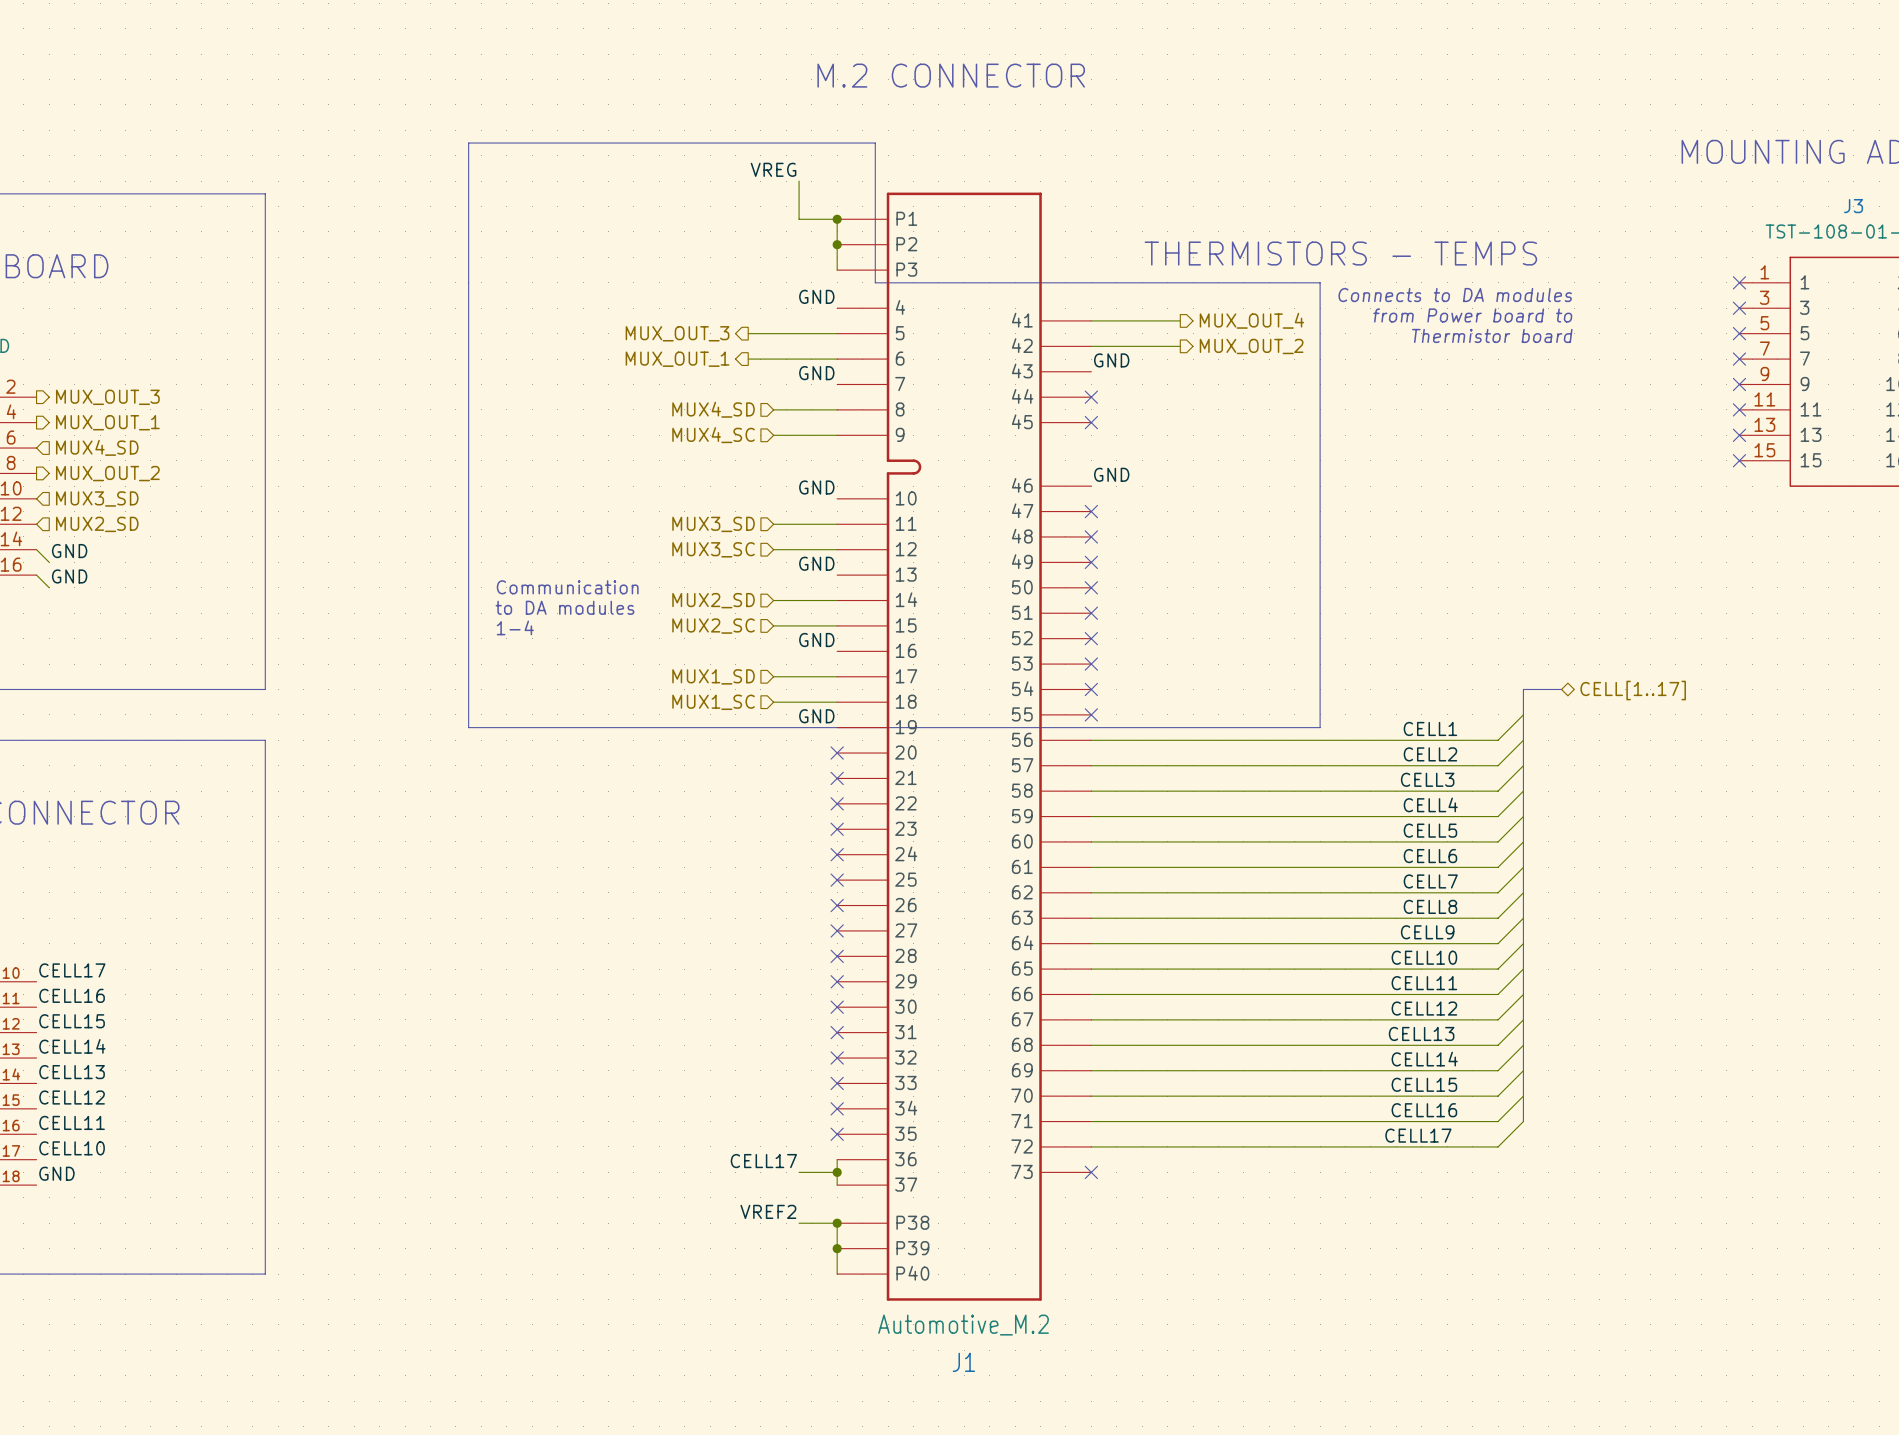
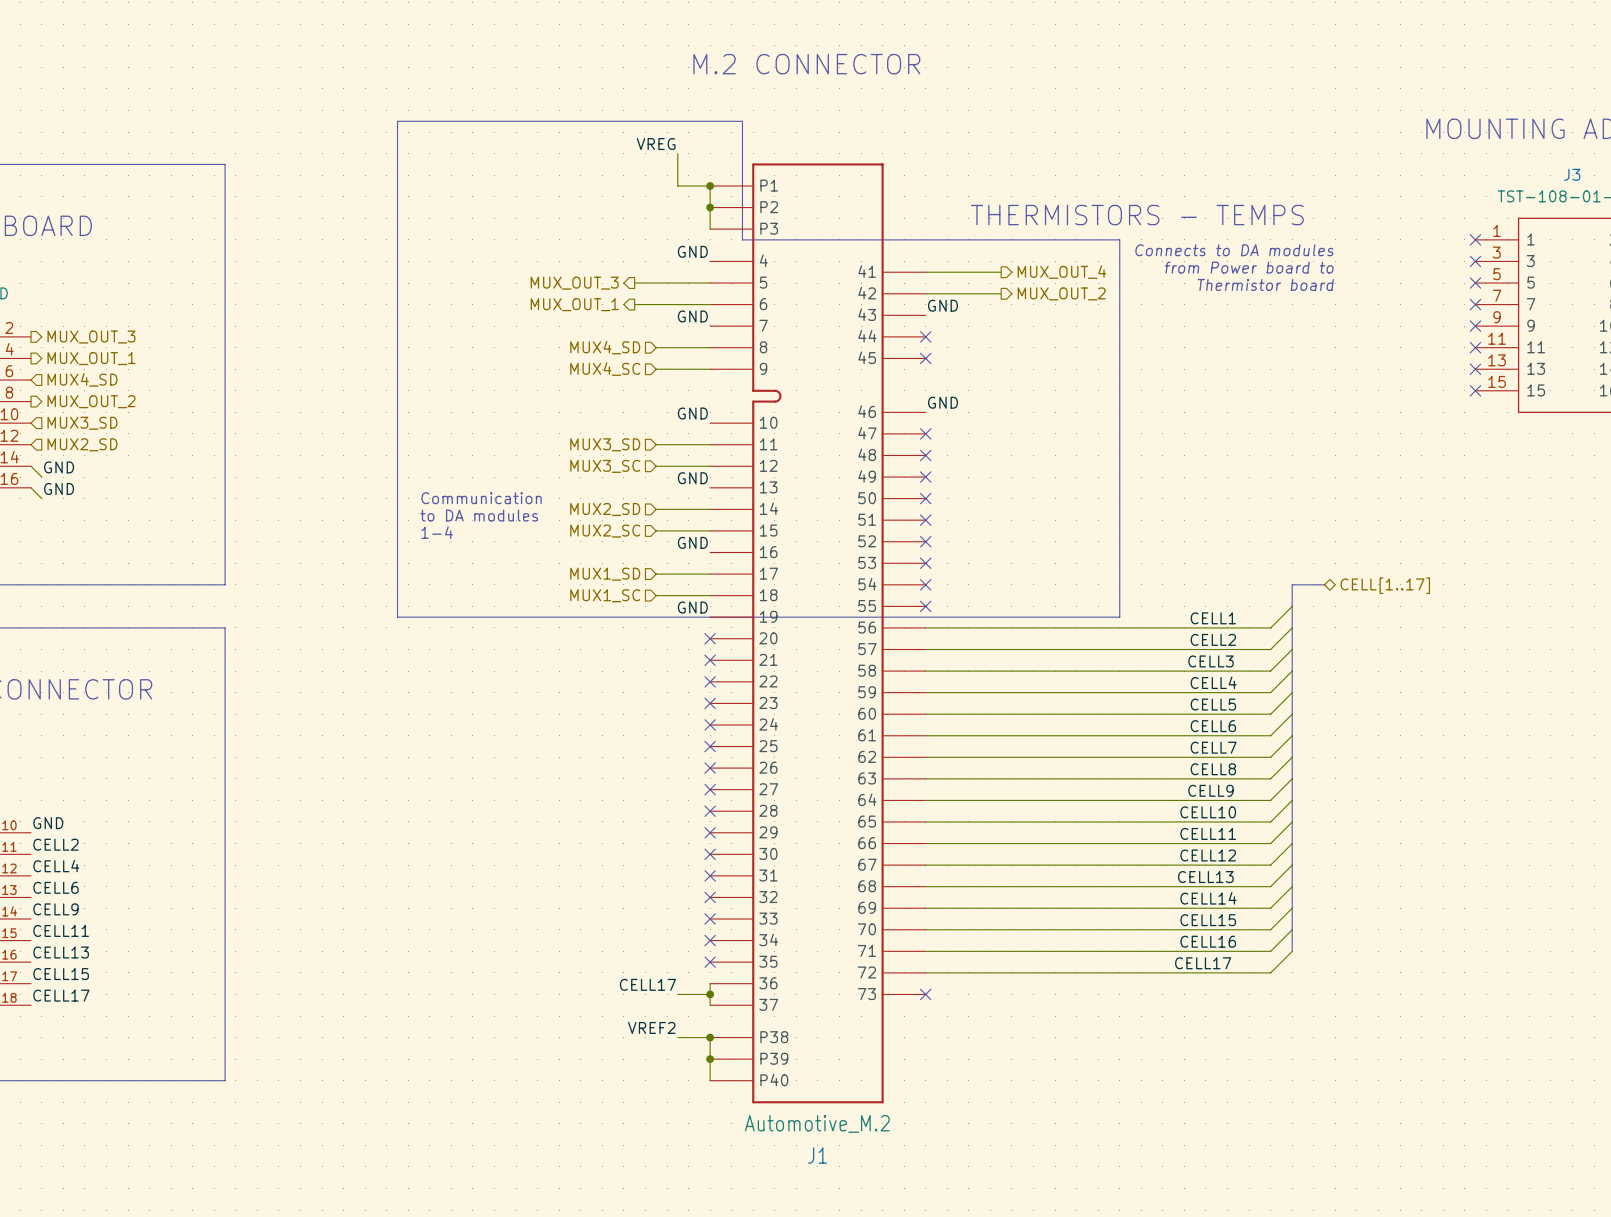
label: CELL17 (72, 970) -> GND (48, 823)
label: CELL16 (72, 995) -> CELL2 (55, 844)
label: CELL15 (72, 1021) -> CELL4 (56, 866)
label: CELL14 (72, 1046) -> CELL6 (55, 887)
label: CELL13 (72, 1072) -> CELL9 (55, 909)
label: CELL12 (72, 1097) -> CELL11 (61, 930)
label: CELL11 (72, 1122) -> CELL13 (61, 952)
label: CELL10 (72, 1148) -> CELL15 (61, 974)
label: GND (56, 1173) -> CELL17 (61, 995)

